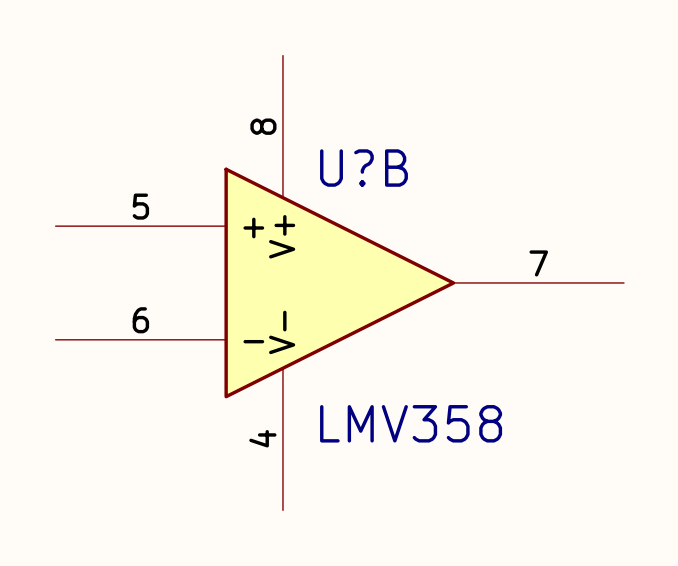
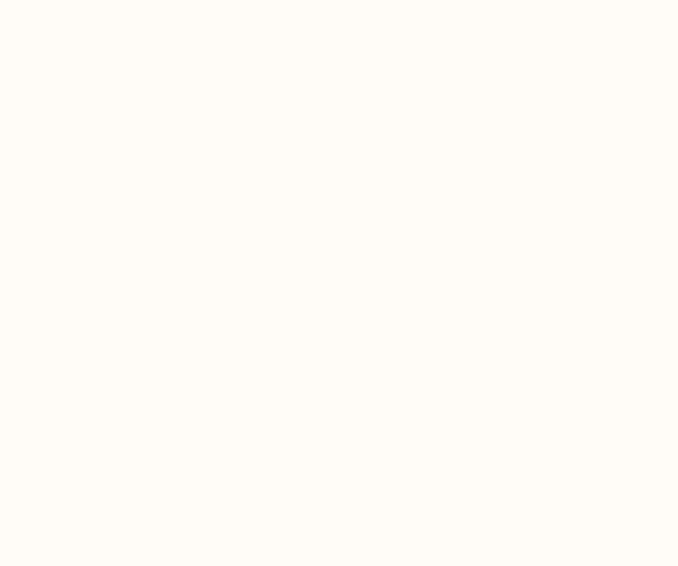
U?B: LMV358 (339, 282) -> none

